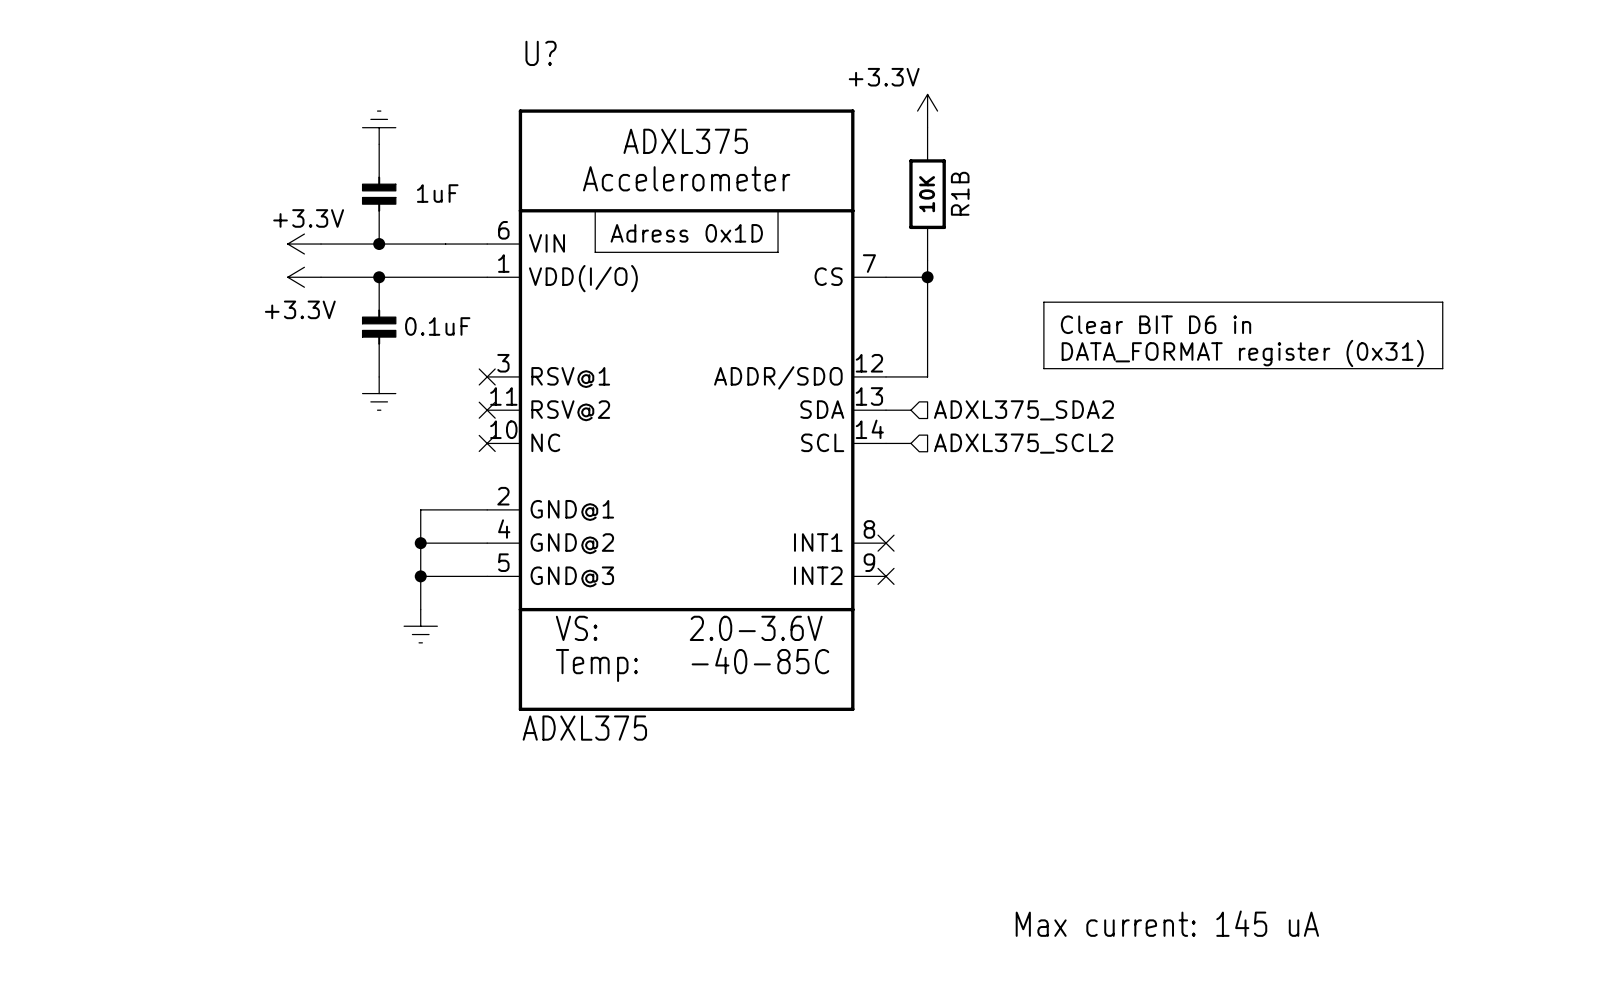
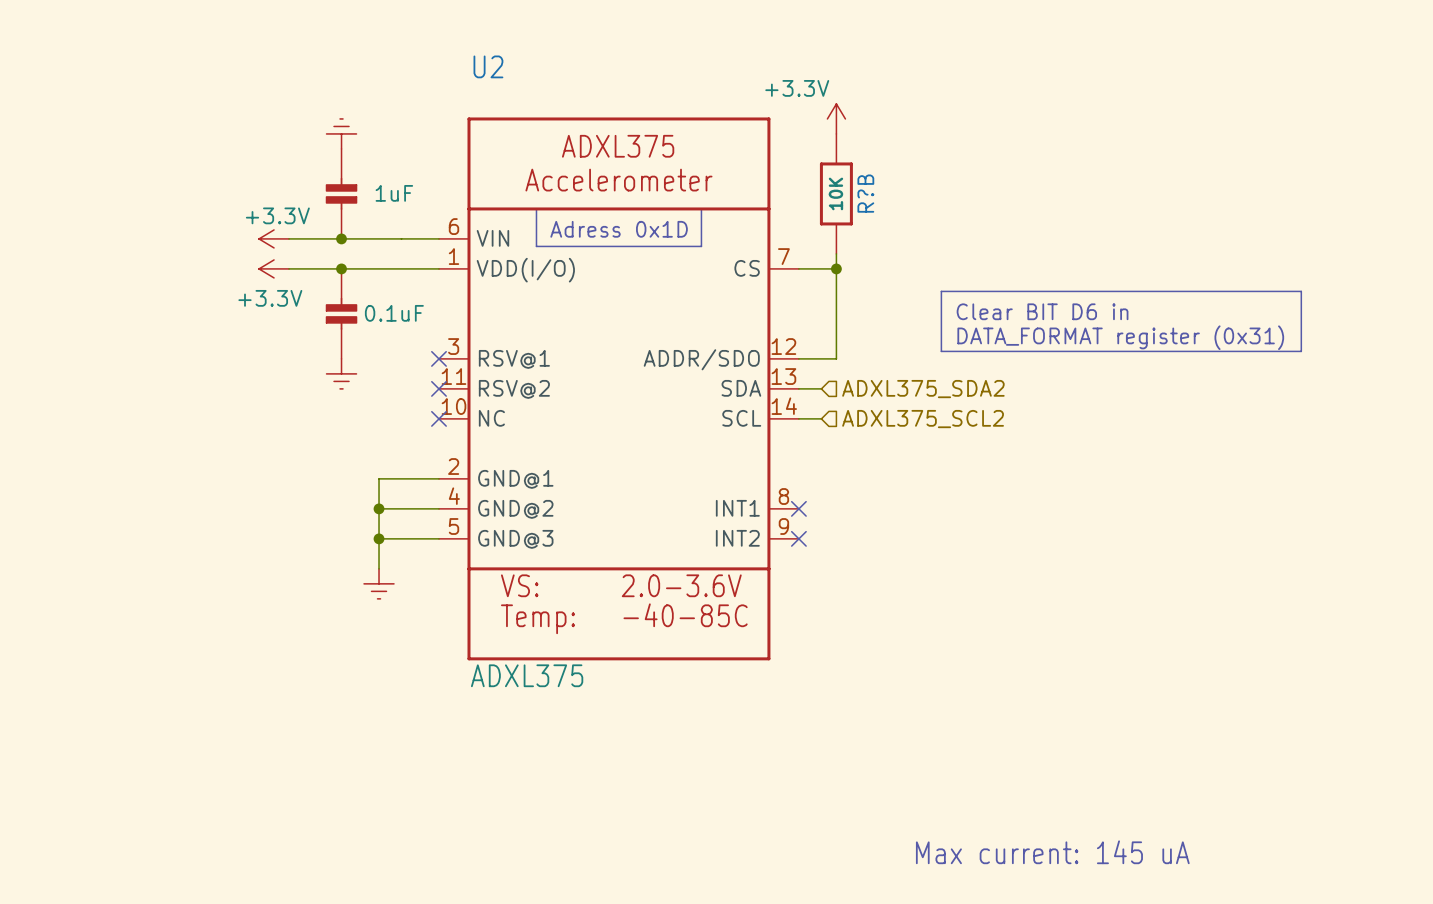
U? name: U? (541, 53) -> U2 (488, 66)
R1B name: R1B (960, 193) -> R?B (865, 193)

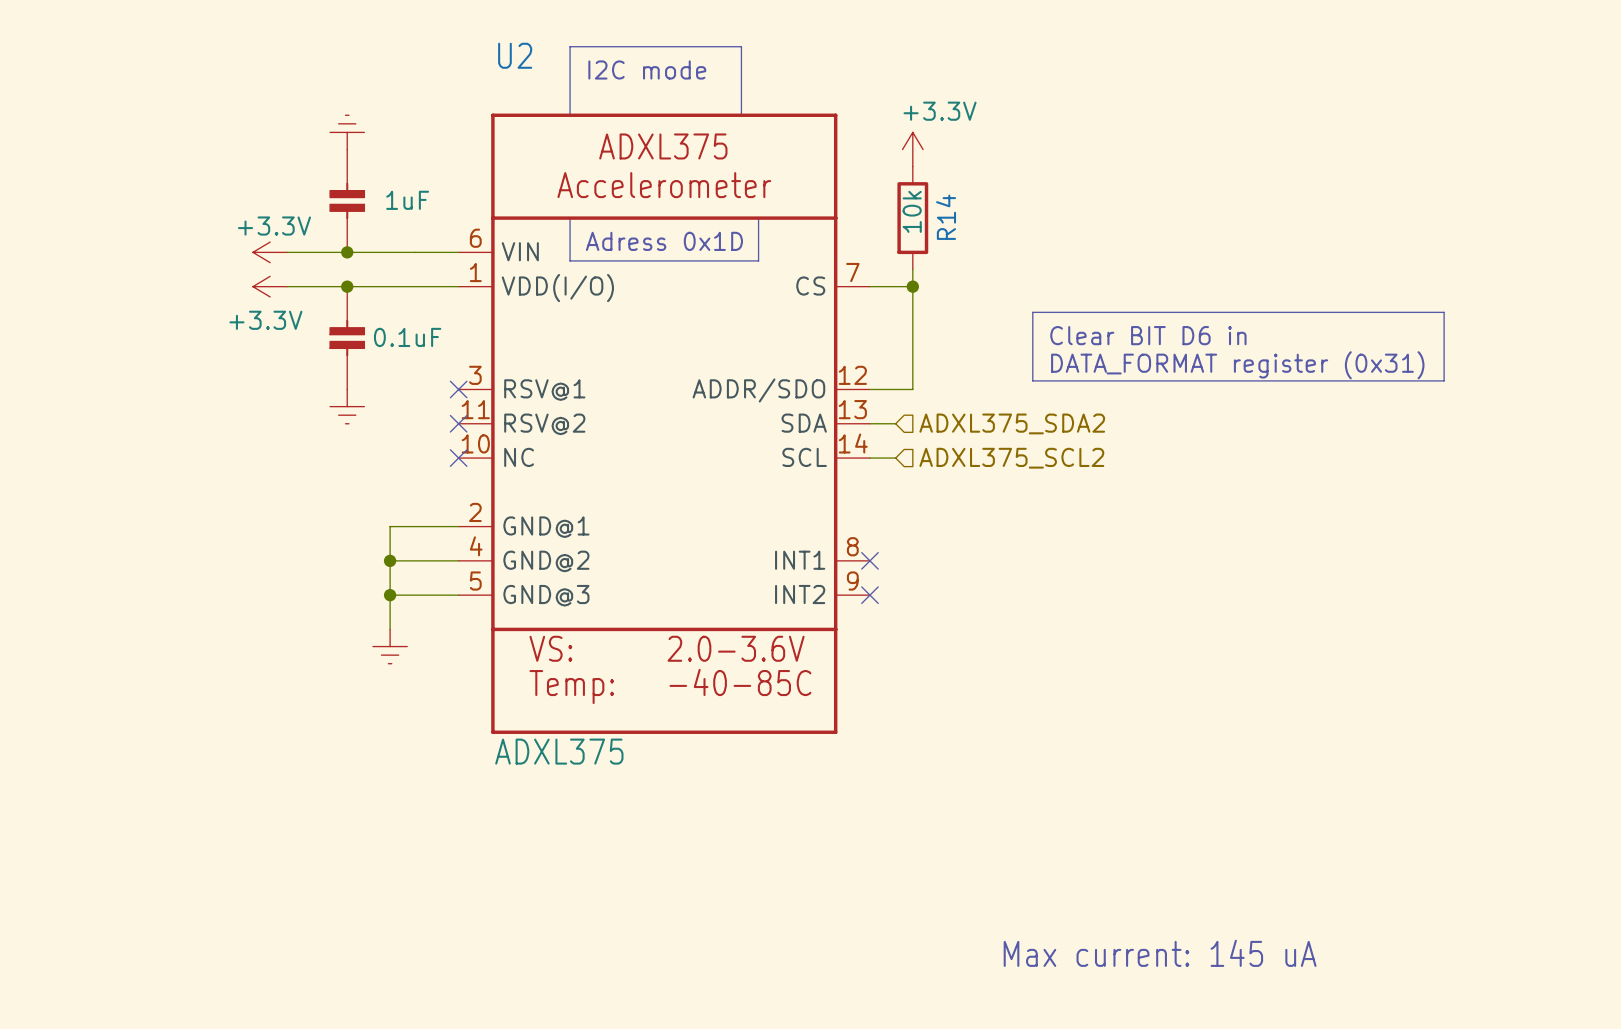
line: none -> (570, 46) (741, 46) (741, 115) (570, 115) (570, 46)
text: none -> I2C mode (647, 69)
power symbol text position: +3.3V (797, 88) -> +3.3V (940, 111)
power symbol position: +3.3V (836, 118) -> +3.3V (912, 149)
R?B: 10K (836, 193) -> none
R14: none -> 10k (912, 218)

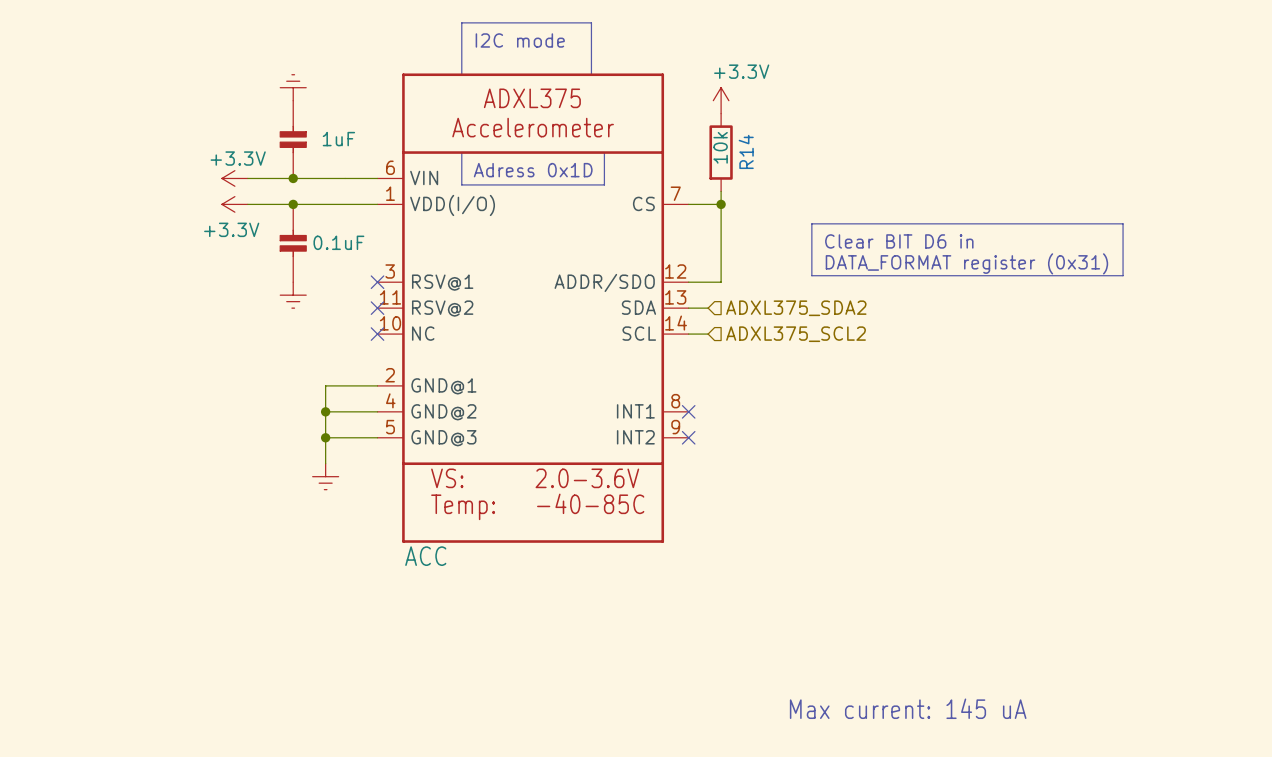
U2 name: U2 (515, 55) -> none
U2 value: ADXL375 (559, 751) -> ACC (425, 556)

